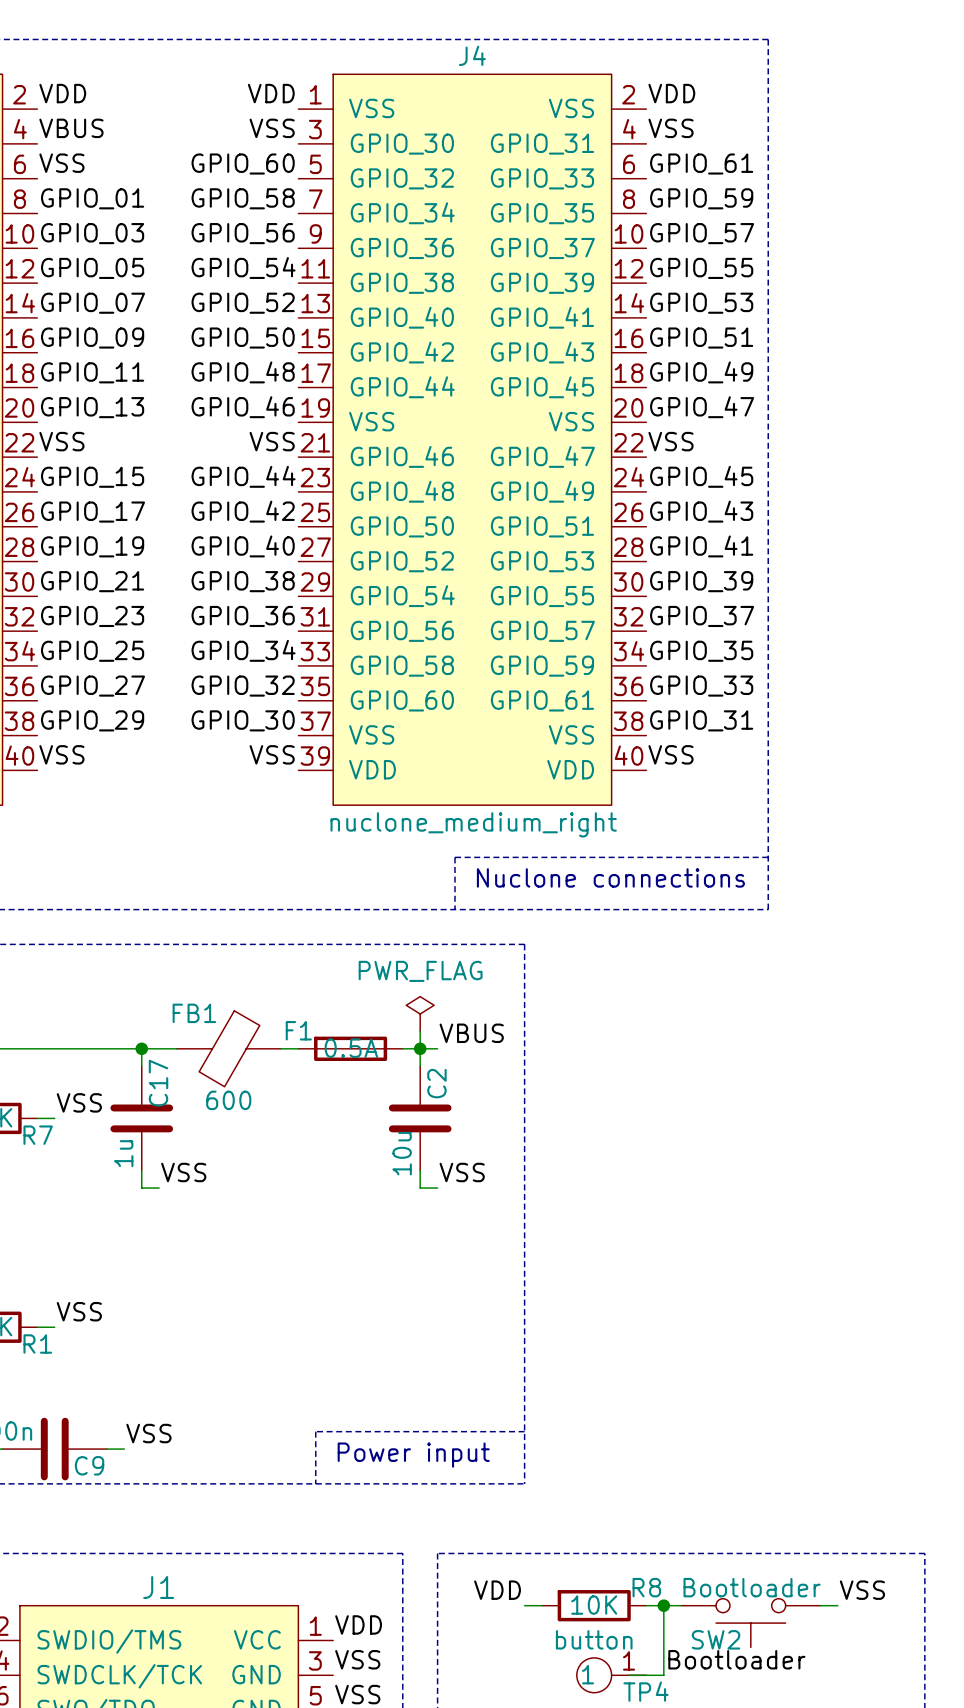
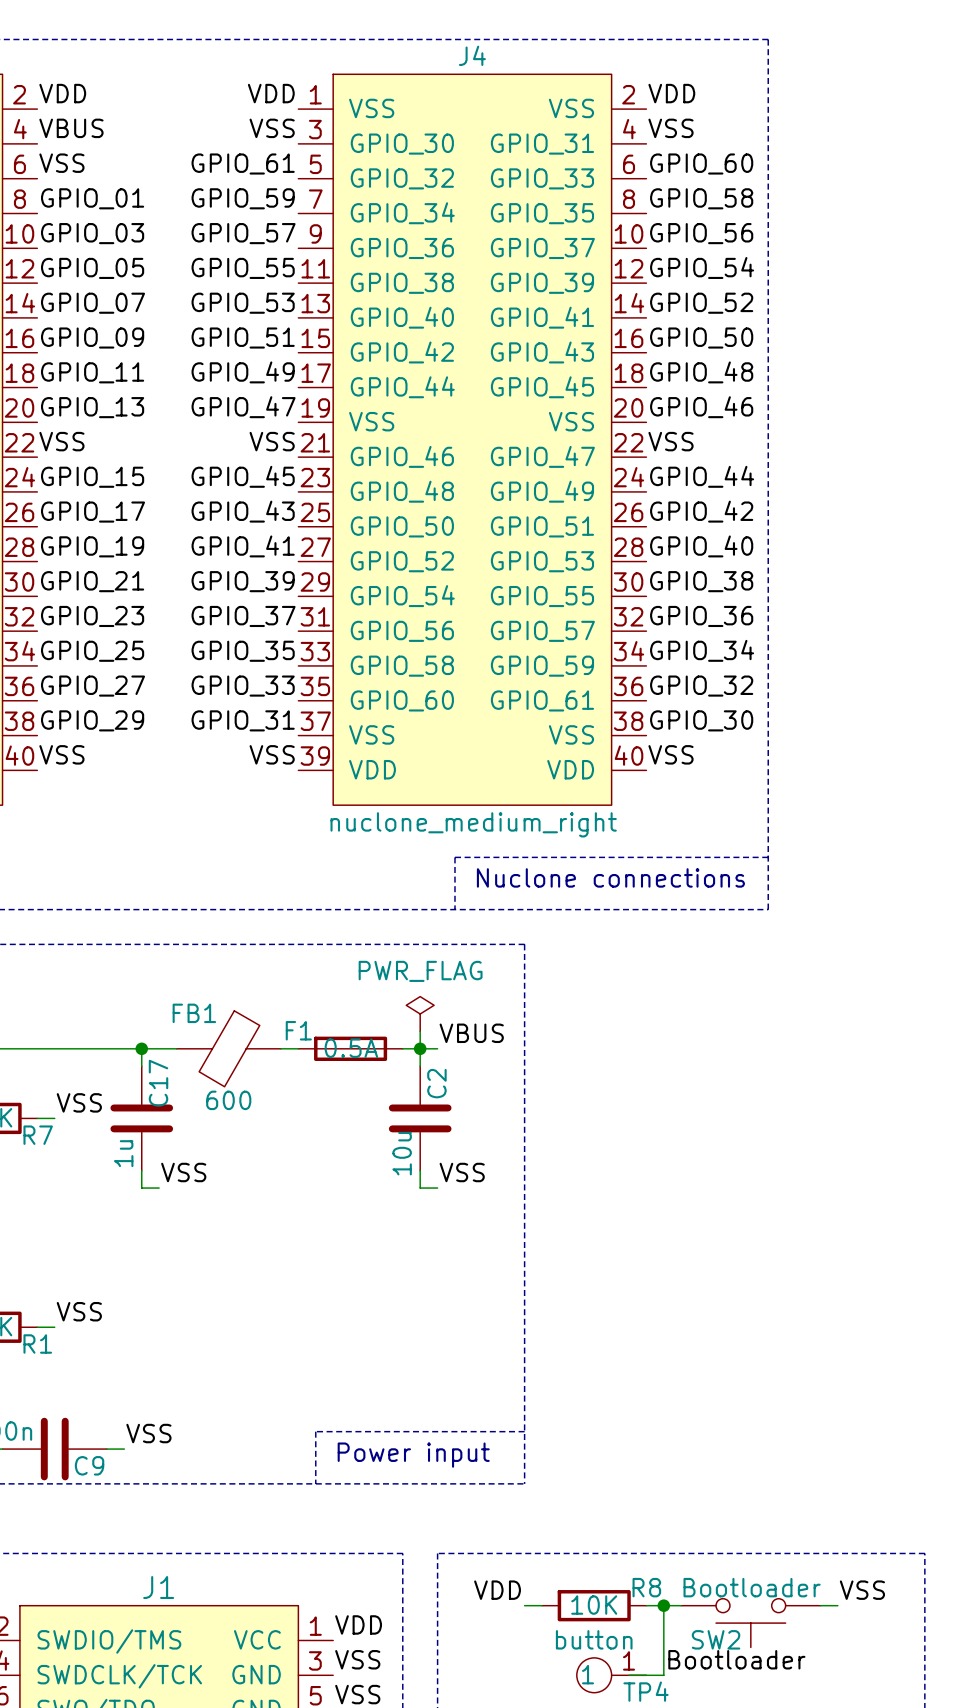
label: GPIO_60 (243, 164) -> GPIO_61 (243, 164)
label: GPIO_61 (701, 164) -> GPIO_60 (701, 164)
label: GPIO_58 (243, 198) -> GPIO_59 (243, 198)
label: GPIO_59 (701, 198) -> GPIO_58 (701, 198)
label: GPIO_56 (243, 233) -> GPIO_57 (243, 233)
label: GPIO_57 (702, 233) -> GPIO_56 (701, 233)
label: GPIO_54 (243, 268) -> GPIO_55 (243, 268)
label: GPIO_55 (701, 268) -> GPIO_54 (702, 268)
label: GPIO_52 (243, 303) -> GPIO_53 (243, 303)
label: GPIO_53 (701, 303) -> GPIO_52 (701, 303)
label: GPIO_50 (243, 338) -> GPIO_51 (243, 338)
label: GPIO_51 (701, 338) -> GPIO_50 (701, 338)
label: GPIO_48 (243, 372) -> GPIO_49 (243, 372)
label: GPIO_49 (701, 372) -> GPIO_48 (701, 372)
label: GPIO_46 (243, 407) -> GPIO_47 (243, 407)
label: GPIO_47 (702, 407) -> GPIO_46 (701, 407)
label: GPIO_44 (243, 476) -> GPIO_45 (243, 476)
label: GPIO_45 (701, 476) -> GPIO_44 (702, 476)
label: GPIO_42 (243, 511) -> GPIO_43 (243, 511)
label: GPIO_43 (701, 511) -> GPIO_42 (701, 511)
label: GPIO_40 (243, 546) -> GPIO_41 (243, 546)
label: GPIO_41 (701, 546) -> GPIO_40 (701, 546)
label: GPIO_38 (243, 581) -> GPIO_39 (243, 581)
label: GPIO_39 (701, 581) -> GPIO_38 (701, 581)
label: GPIO_36 (243, 616) -> GPIO_37 (243, 616)
label: GPIO_37 (702, 616) -> GPIO_36 (701, 616)
label: GPIO_34 (243, 650) -> GPIO_35 (243, 651)
label: GPIO_35 (701, 651) -> GPIO_34 (702, 650)
label: GPIO_32 (243, 686) -> GPIO_33 (243, 686)
label: GPIO_33 (701, 686) -> GPIO_32 (701, 686)
label: GPIO_30 (243, 720) -> GPIO_31 (243, 720)
label: GPIO_31 (701, 720) -> GPIO_30 (701, 720)

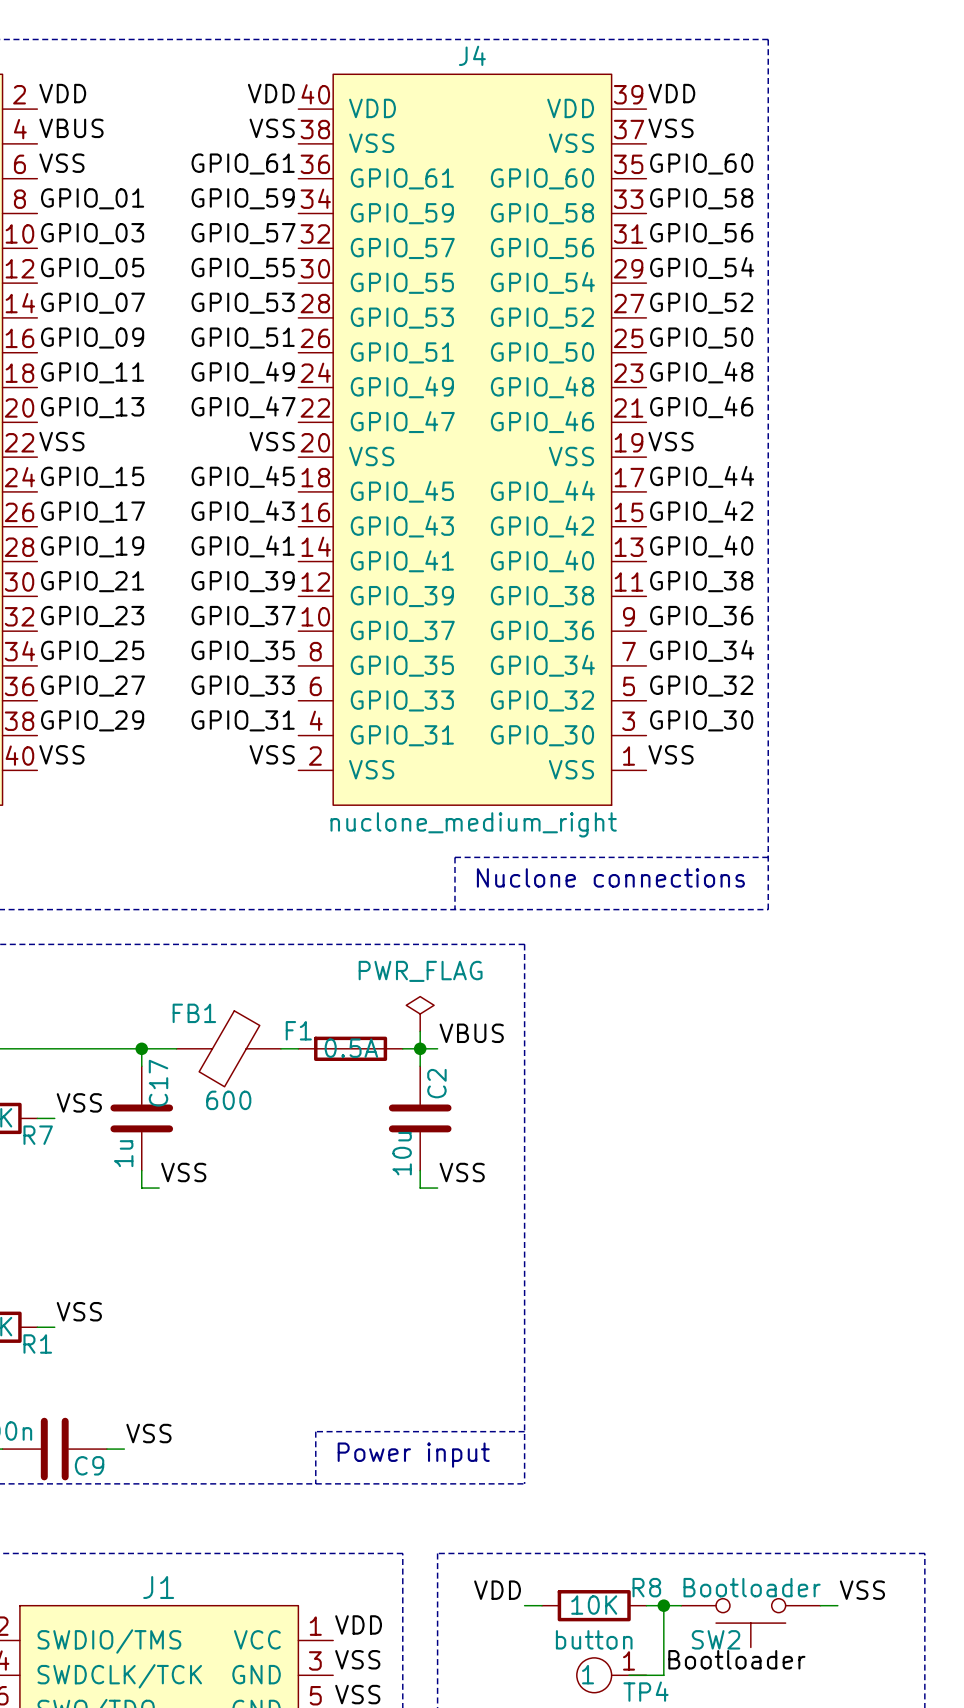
J4 rotation: 0° (472, 439) -> 180° (472, 439)

